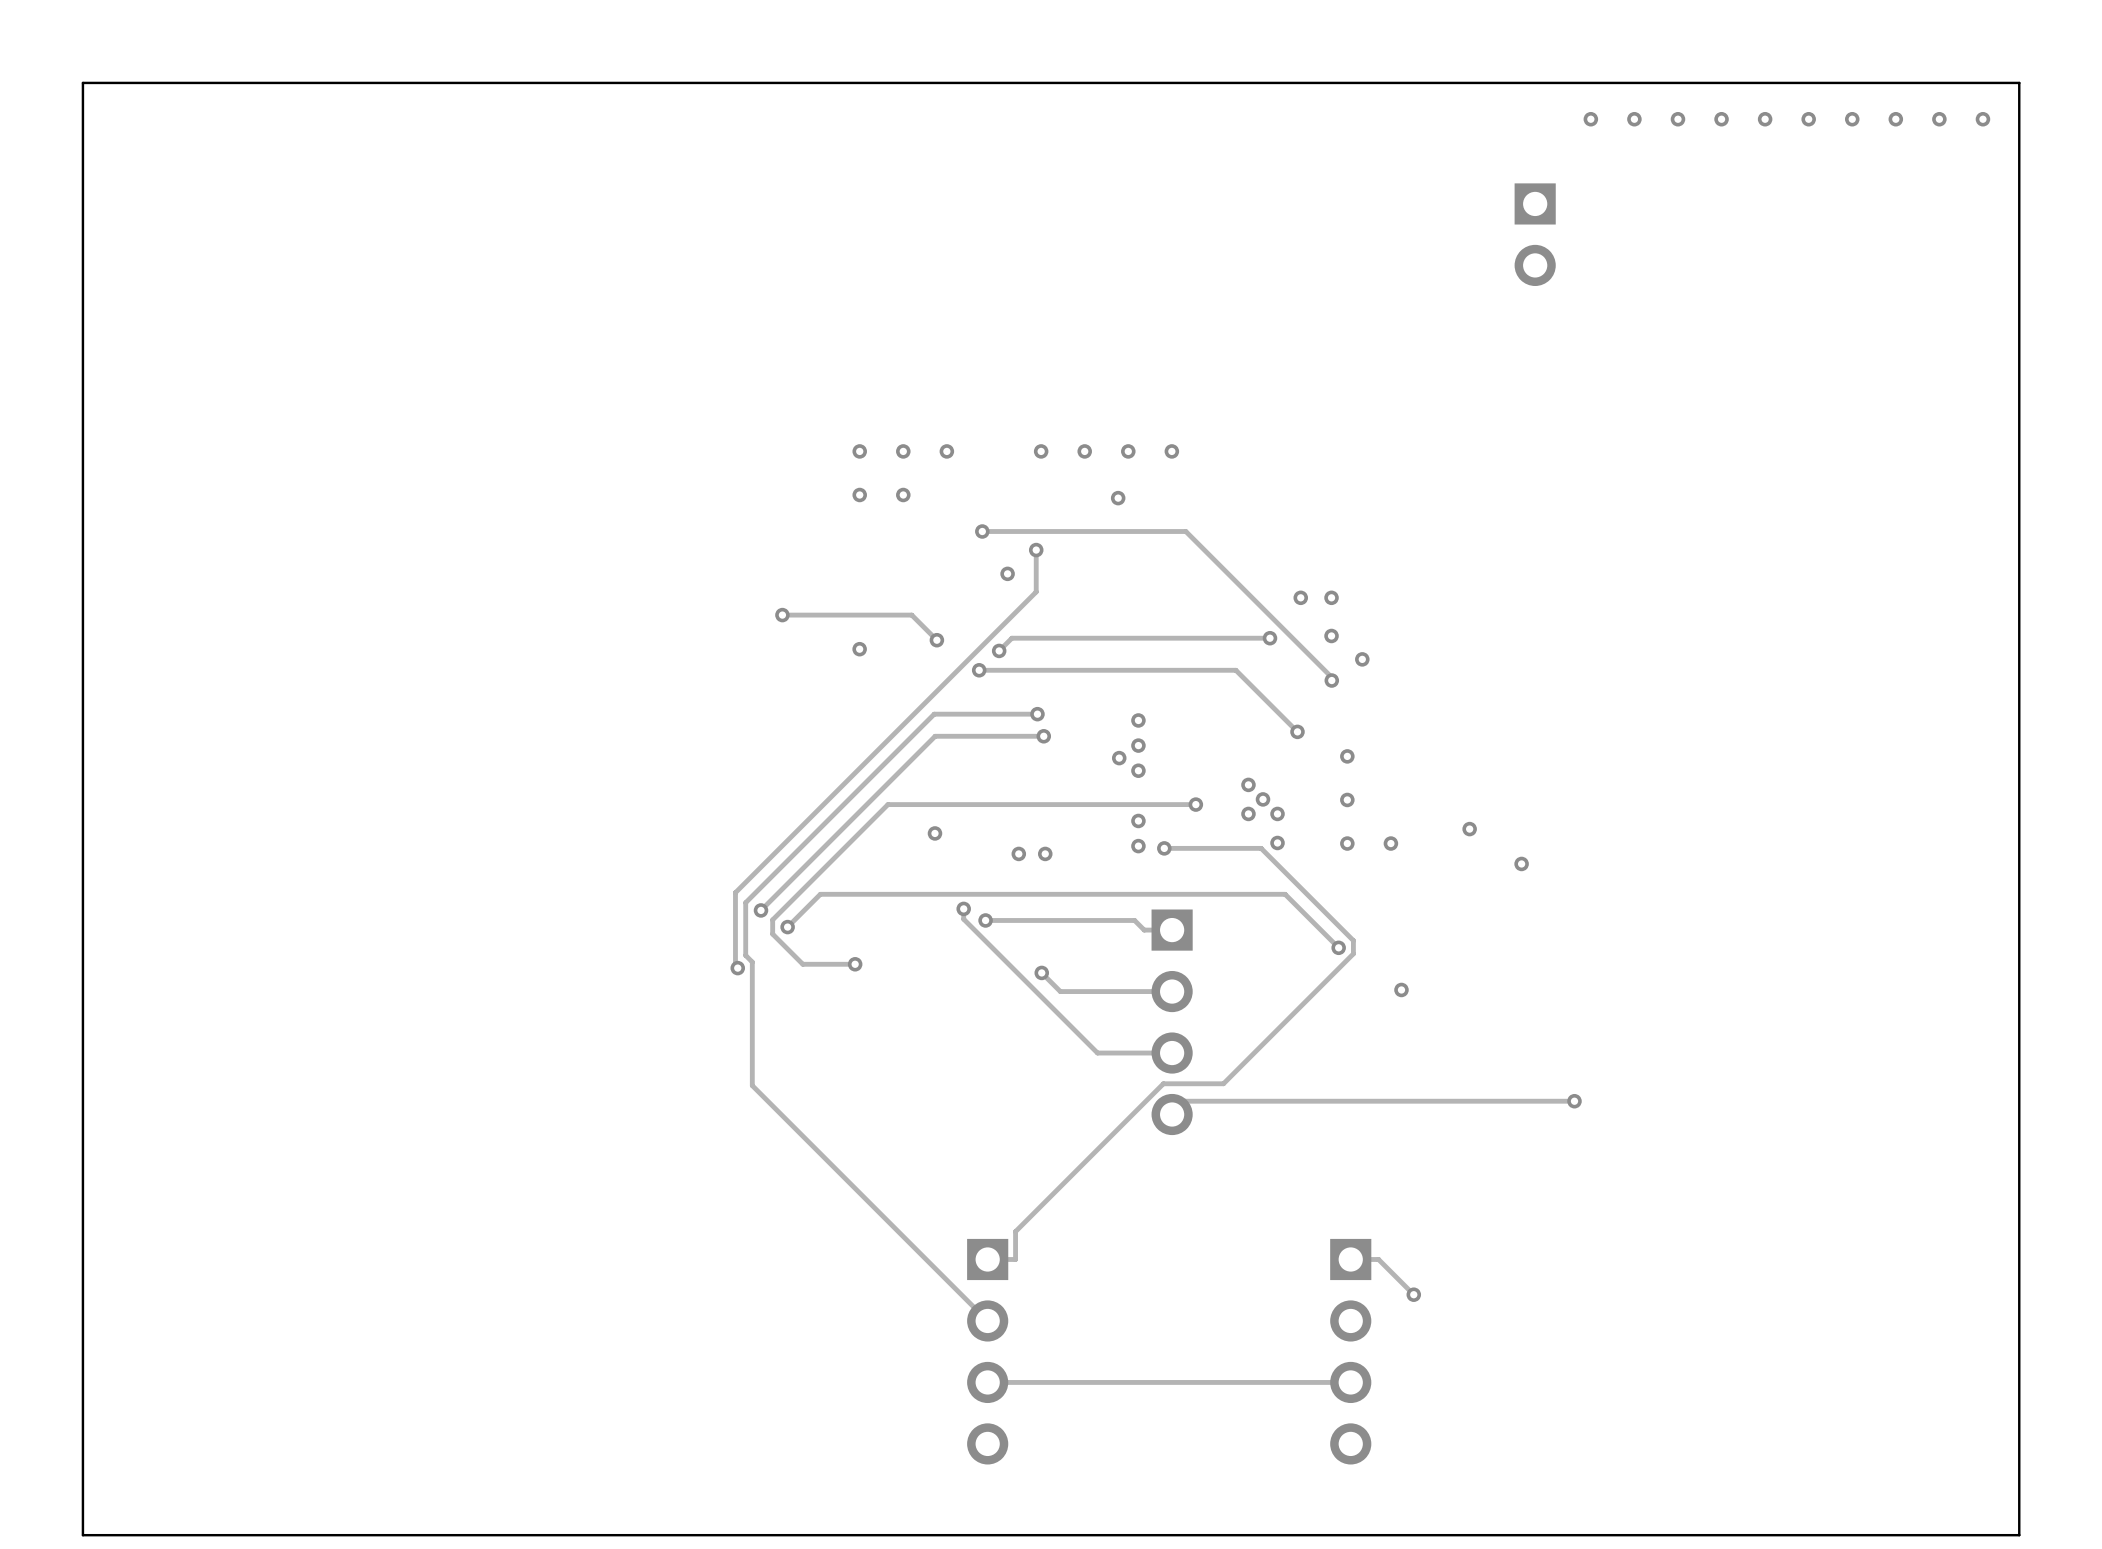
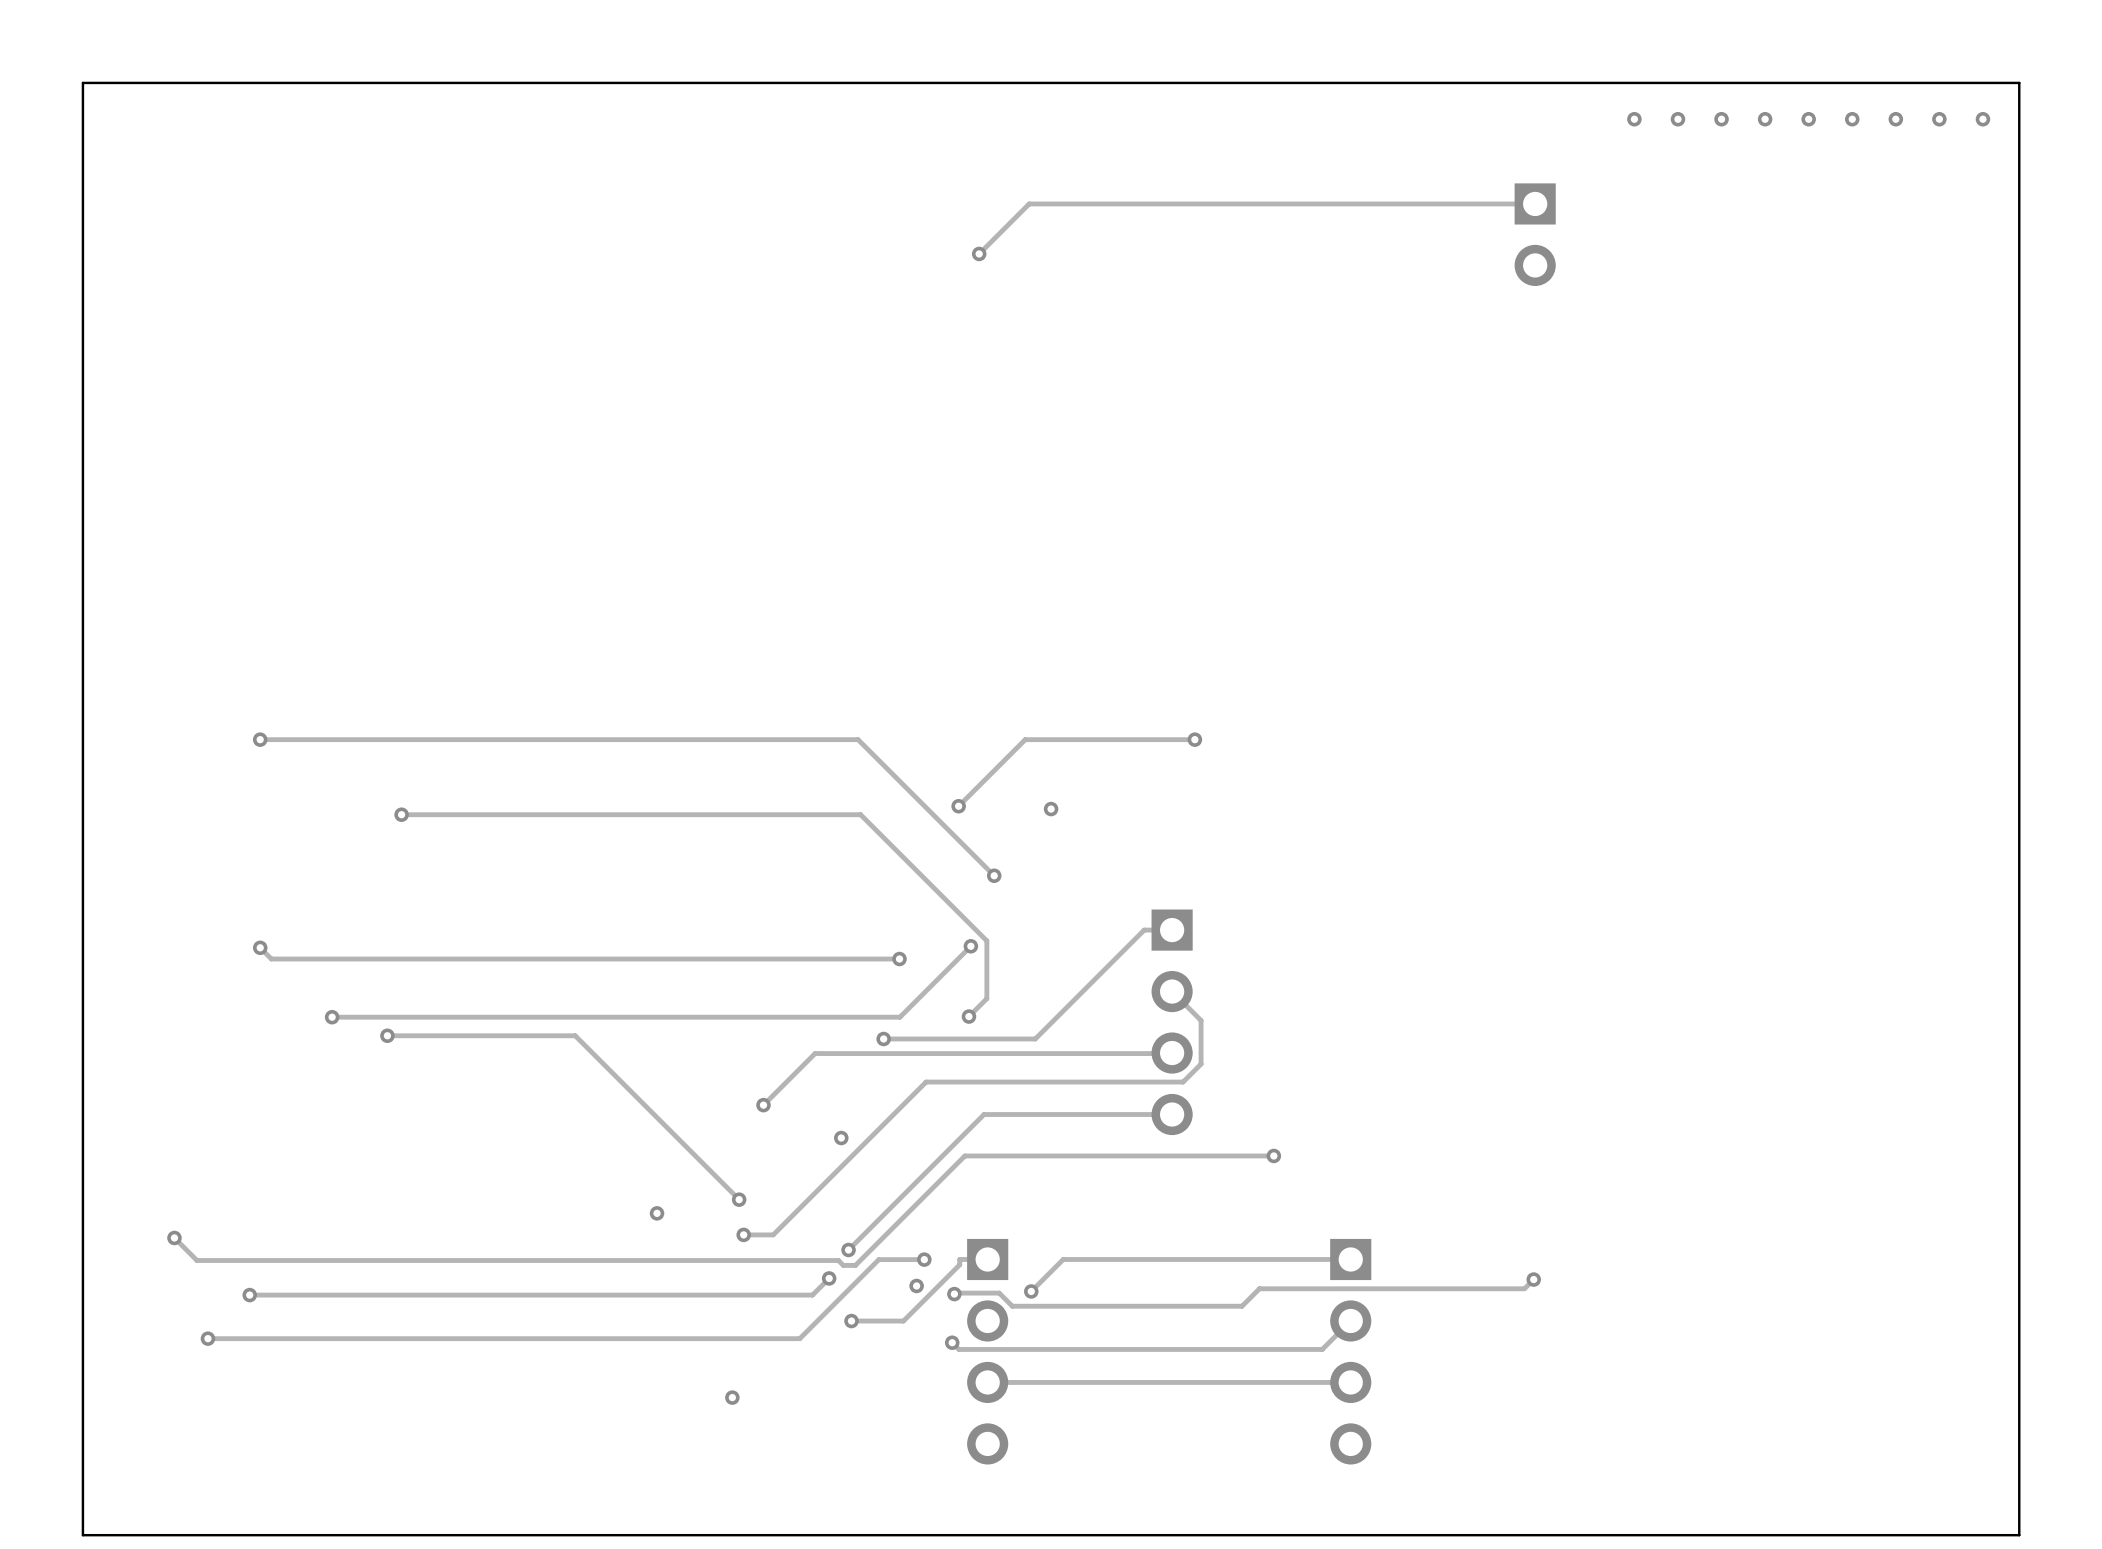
via: (1590, 119) -> none
track: none -> (1535, 203) (1029, 203) (979, 253)
via: none -> (979, 253)
via: (859, 451) -> none
via: (903, 451) -> none
via: (946, 451) -> none
via: (1041, 451) -> none
via: (1084, 451) -> none
via: (1128, 451) -> none
via: (1171, 451) -> none
via: (859, 495) -> none
via: (903, 495) -> none
via: (1118, 498) -> none
track: (982, 531) (1185, 531) (1331, 677) (1331, 680) -> none
via: (982, 531) -> none
track: (1036, 550) (1036, 591) (735, 892) (735, 965) (737, 968) -> none
via: (1036, 550) -> none
via: (1007, 573) -> none
via: (1300, 597) -> none
via: (1331, 597) -> none
track: (782, 615) (911, 615) (936, 640) -> none
via: (782, 615) -> none
via: (1331, 635) -> none
track: (1269, 638) (1011, 638) (999, 650) -> none
via: (1269, 638) -> none
via: (936, 640) -> none
via: (859, 649) -> none
via: (999, 650) -> none
via: (1362, 659) -> none
track: (979, 670) (1235, 670) (1297, 731) -> none
via: (979, 670) -> none
via: (1331, 680) -> none
track: (1037, 714) (934, 714) (745, 902) (745, 955) (752, 962) (752, 1085) (987, 1320) -> none
via: (1037, 714) -> none
via: (1138, 720) -> none
via: (1297, 731) -> none
track: (1043, 736) (935, 736) (760, 910) -> none
via: (1043, 736) -> none
track: none -> (260, 739) (858, 739) (994, 875)
via: none -> (260, 739)
track: none -> (1194, 739) (1025, 739) (958, 806)
via: none -> (1194, 739)
via: (1138, 745) -> none
via: (1347, 756) -> none
via: (1119, 758) -> none
via: (1138, 770) -> none
via: (1248, 784) -> none
via: (1262, 799) -> none
via: (1347, 799) -> none
track: (1195, 804) (887, 804) (772, 919) (772, 934) (802, 964) (855, 964) -> none
via: (1195, 804) -> none
via: none -> (1051, 809)
via: (1248, 813) -> none
via: (1277, 813) -> none
track: none -> (401, 814) (860, 814) (986, 940) (986, 998) (968, 1016)
via: none -> (401, 814)
via: (1138, 820) -> none
via: (1469, 829) -> none
via position: (934, 833) -> (958, 806)
via: (1277, 842) -> none
via: (1347, 843) -> none
via: (1390, 843) -> none
via: (1138, 846) -> none
track: (1164, 848) (1261, 848) (1353, 940) (1353, 953) (1223, 1083) (1163, 1083) (1015, 1231) (1015, 1259) (987, 1259) -> (851, 1321) (903, 1321) (959, 1264) (959, 1259) (987, 1259)
via: (1164, 848) -> none
via: (1018, 853) -> none
via: (1045, 853) -> none
via: (1521, 863) -> none
via: none -> (994, 875)
track: (963, 908) (963, 919) (1097, 1053) (1172, 1053) -> (763, 1105) (815, 1053) (1172, 1053)
via: (963, 908) -> none
via: (760, 910) -> none
track: (985, 920) (1134, 920) (1144, 930) -> (883, 1038) (1035, 1038) (1144, 930)
via: (985, 920) -> none
track: (787, 927) (820, 894) (1285, 894) (1338, 947) -> none
via: (787, 927) -> none
track: none -> (970, 946) (899, 1017) (332, 1017)
via: none -> (970, 946)
track: none -> (260, 947) (271, 959) (899, 959)
via: none -> (260, 947)
via: (1338, 947) -> none
via: none -> (899, 959)
via: (855, 964) -> none
via: (737, 968) -> none
track: (1041, 972) (1060, 991) (1172, 991) -> (743, 1234) (773, 1234) (926, 1082) (1183, 1082) (1201, 1064) (1201, 1020) (1172, 991)
via: (1041, 972) -> none
via: (1401, 989) -> none
via: none -> (968, 1016)
via: none -> (332, 1017)
track: none -> (387, 1035) (575, 1035) (739, 1199)
via: none -> (387, 1035)
via: none -> (883, 1038)
track: (1574, 1101) (1185, 1101) (1172, 1114) -> (848, 1249) (984, 1114) (1172, 1114)
via: (1574, 1101) -> none
via: none -> (763, 1105)
via: none -> (841, 1138)
track: none -> (1273, 1155) (964, 1155) (855, 1265) (843, 1265) (838, 1260) (196, 1260) (174, 1237)
via: none -> (1273, 1155)
via: none -> (739, 1199)
via: none -> (657, 1213)
via: none -> (743, 1234)
via: none -> (174, 1237)
via: none -> (848, 1249)
track: none -> (924, 1259) (878, 1259) (799, 1338) (207, 1338)
via: none -> (924, 1259)
track: (1350, 1259) (1378, 1259) (1413, 1294) -> (1350, 1259) (1063, 1259) (1031, 1291)
track: none -> (829, 1278) (812, 1295) (249, 1295)
via: none -> (829, 1278)
track: none -> (1533, 1279) (1524, 1288) (1259, 1288) (1242, 1306) (1012, 1306) (999, 1293) (954, 1294)
via: none -> (1533, 1279)
via: none -> (916, 1285)
via: none -> (1031, 1291)
via: none -> (954, 1294)
via: (1413, 1294) -> none
via: none -> (249, 1295)
track: none -> (1350, 1320) (1322, 1349) (958, 1349) (952, 1342)
via: none -> (851, 1321)
via: none -> (207, 1338)
via: none -> (952, 1342)
via: none -> (732, 1397)

